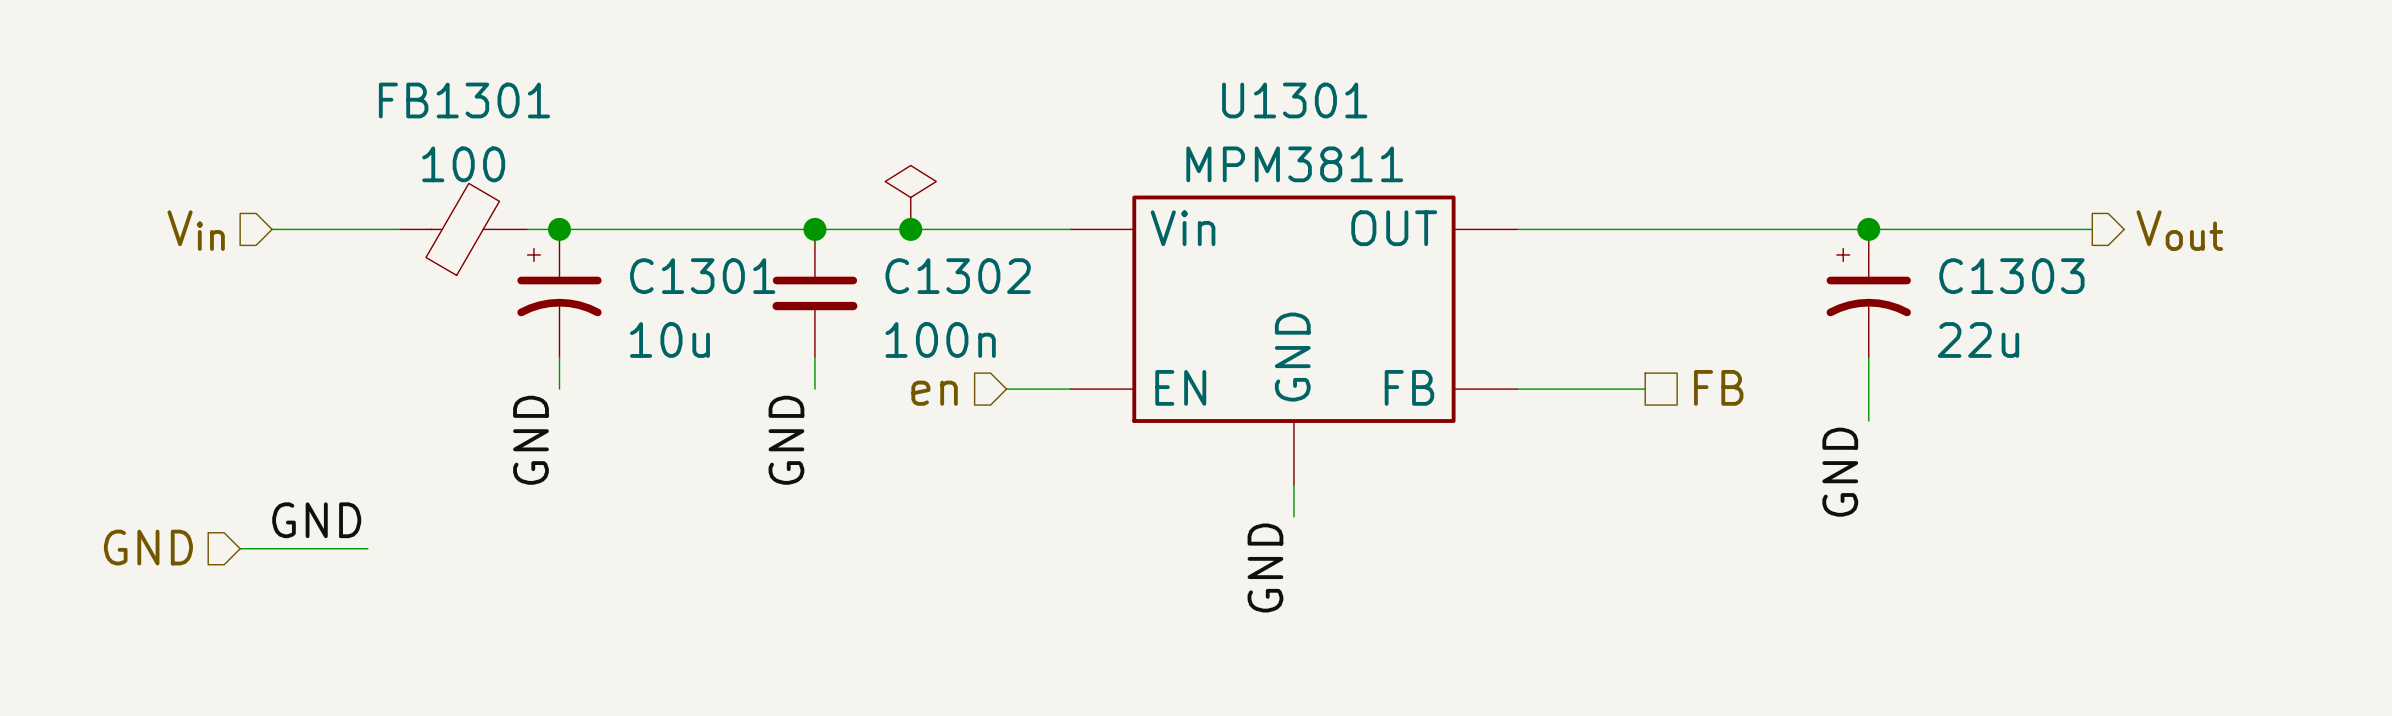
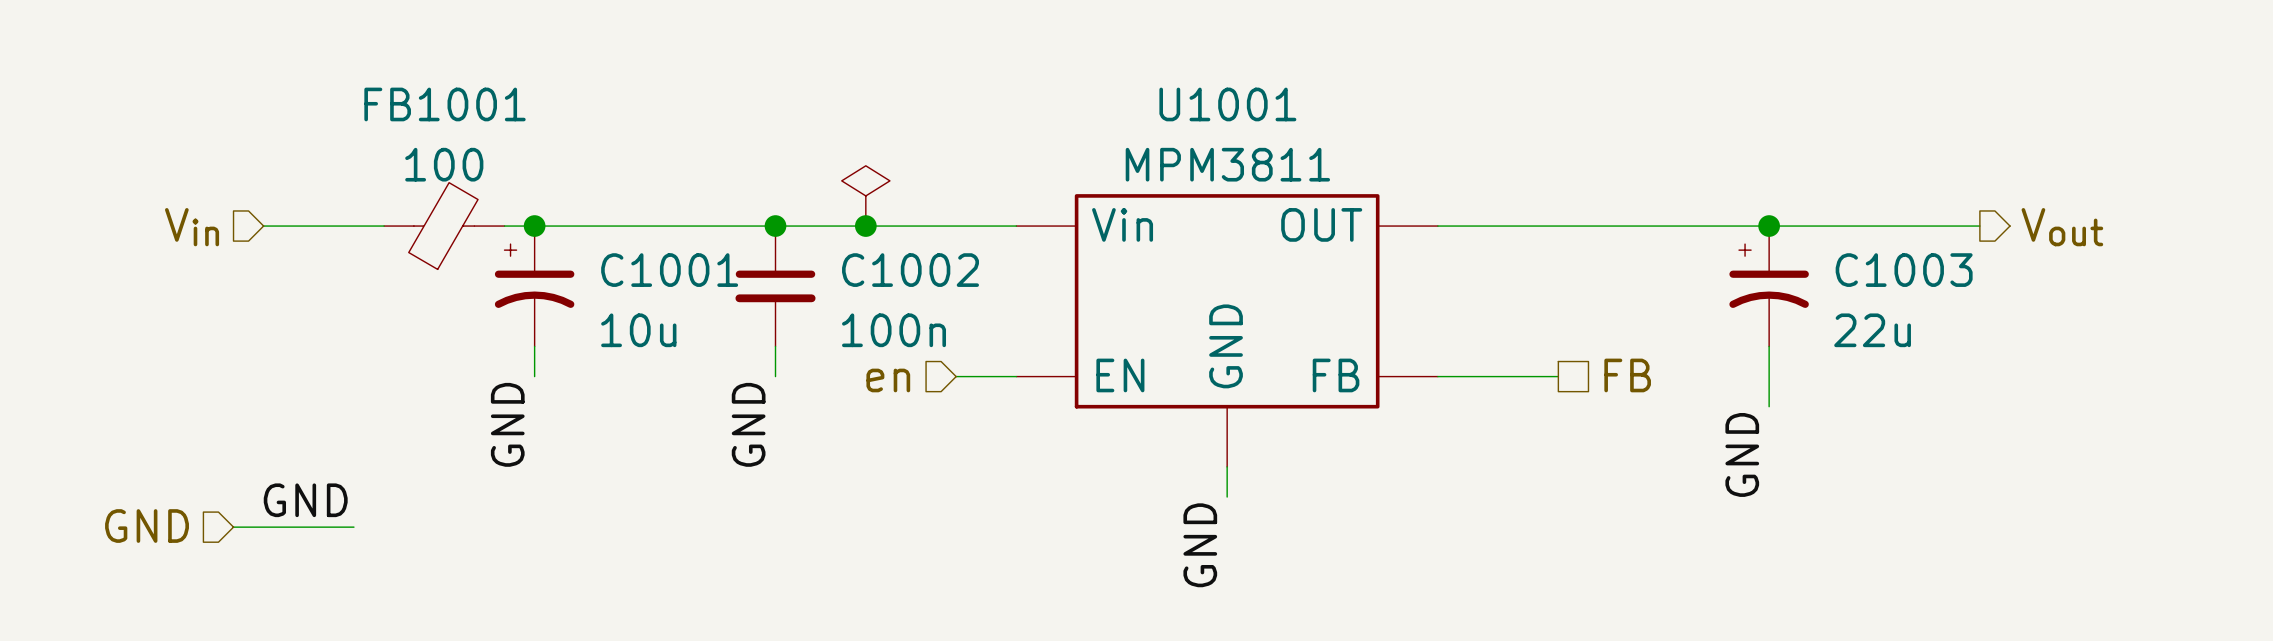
FB1301 name: FB1301 (464, 100) -> FB1001 (445, 104)
U1301 name: U1301 (1294, 100) -> U1001 (1227, 104)
C1301 name: C1301 (702, 276) -> C1001 (669, 270)
C1302 name: C1302 (958, 276) -> C1002 (910, 270)
C1303 name: C1303 (2011, 276) -> C1003 (1904, 270)

